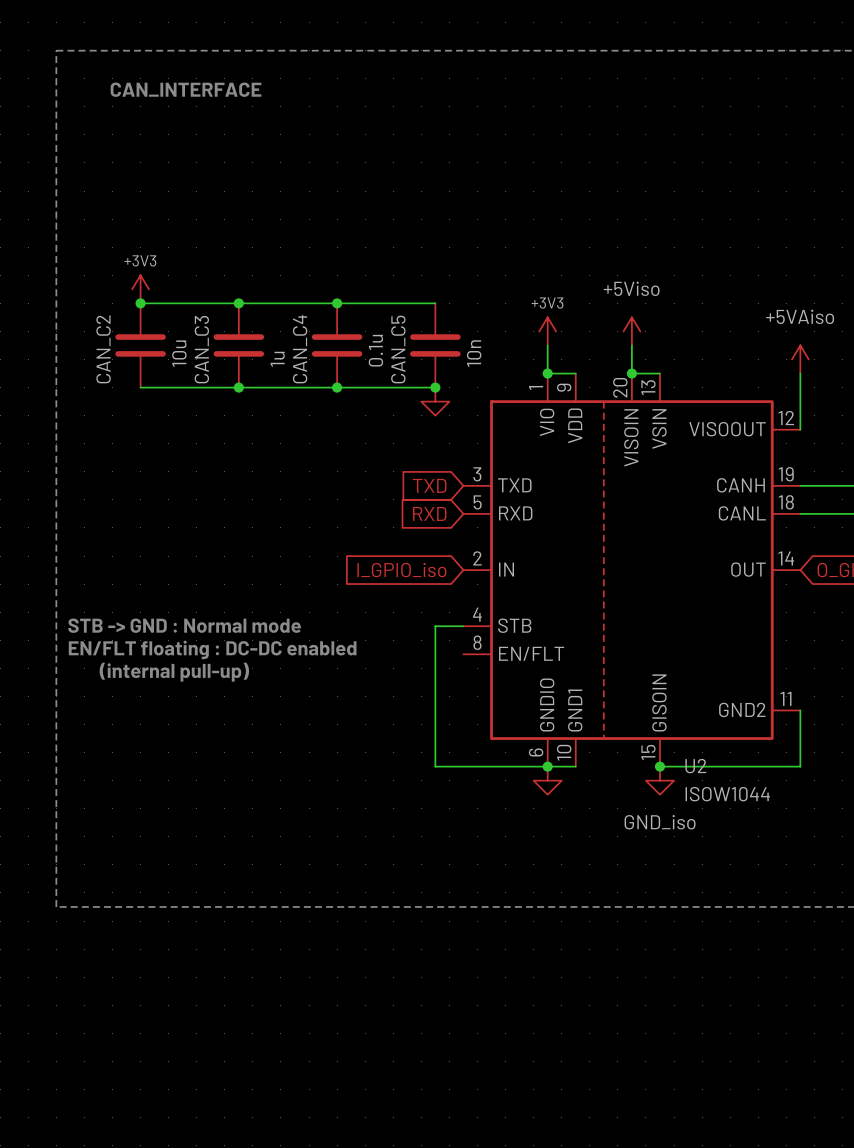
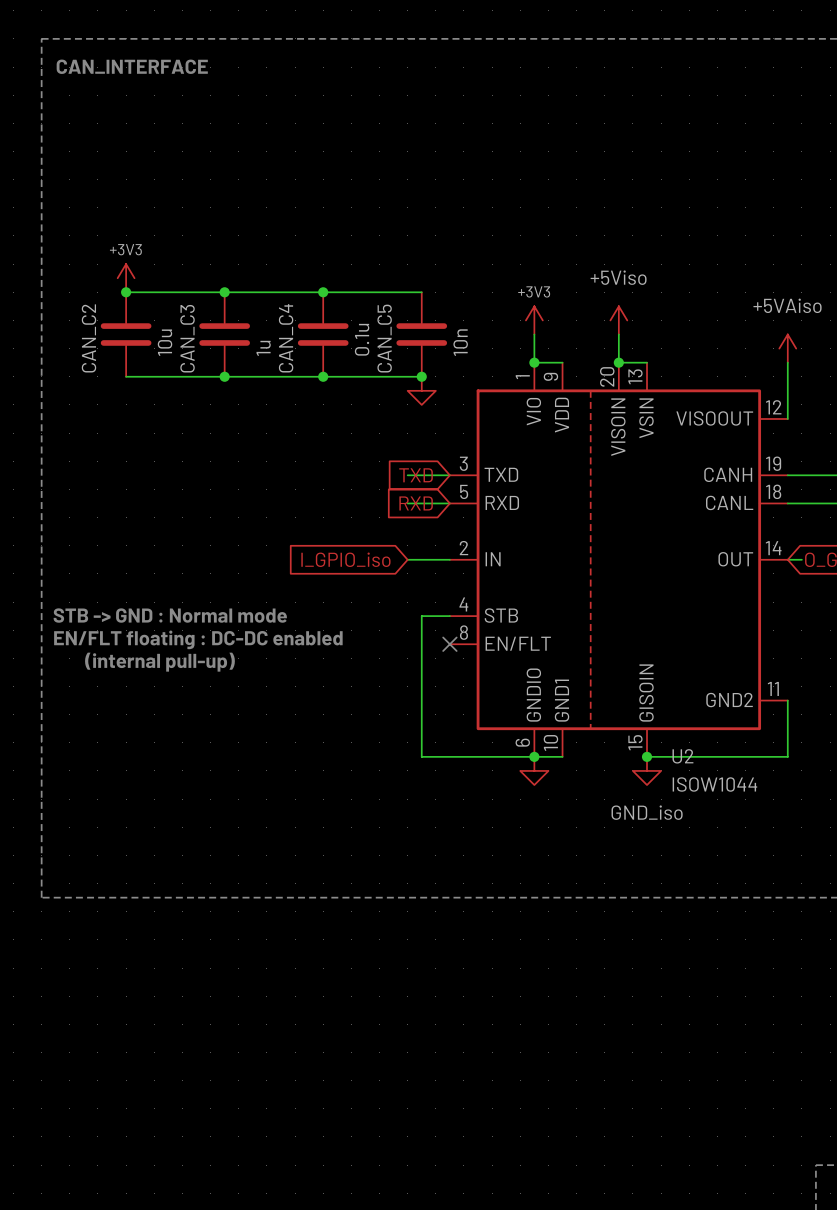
text position: CAN_INTERFACE (186, 89) -> CAN_INTERFACE (132, 66)
wire: none -> (407, 475) (449, 475)
wire: none -> (407, 503) (449, 503)
global label position: I_GPIO_iso (401, 570) -> I_GPIO_iso (345, 559)
wire: none -> (407, 559) (449, 559)
wire: none -> (787, 559) (801, 559)
no-connect mark: none -> (449, 644)

